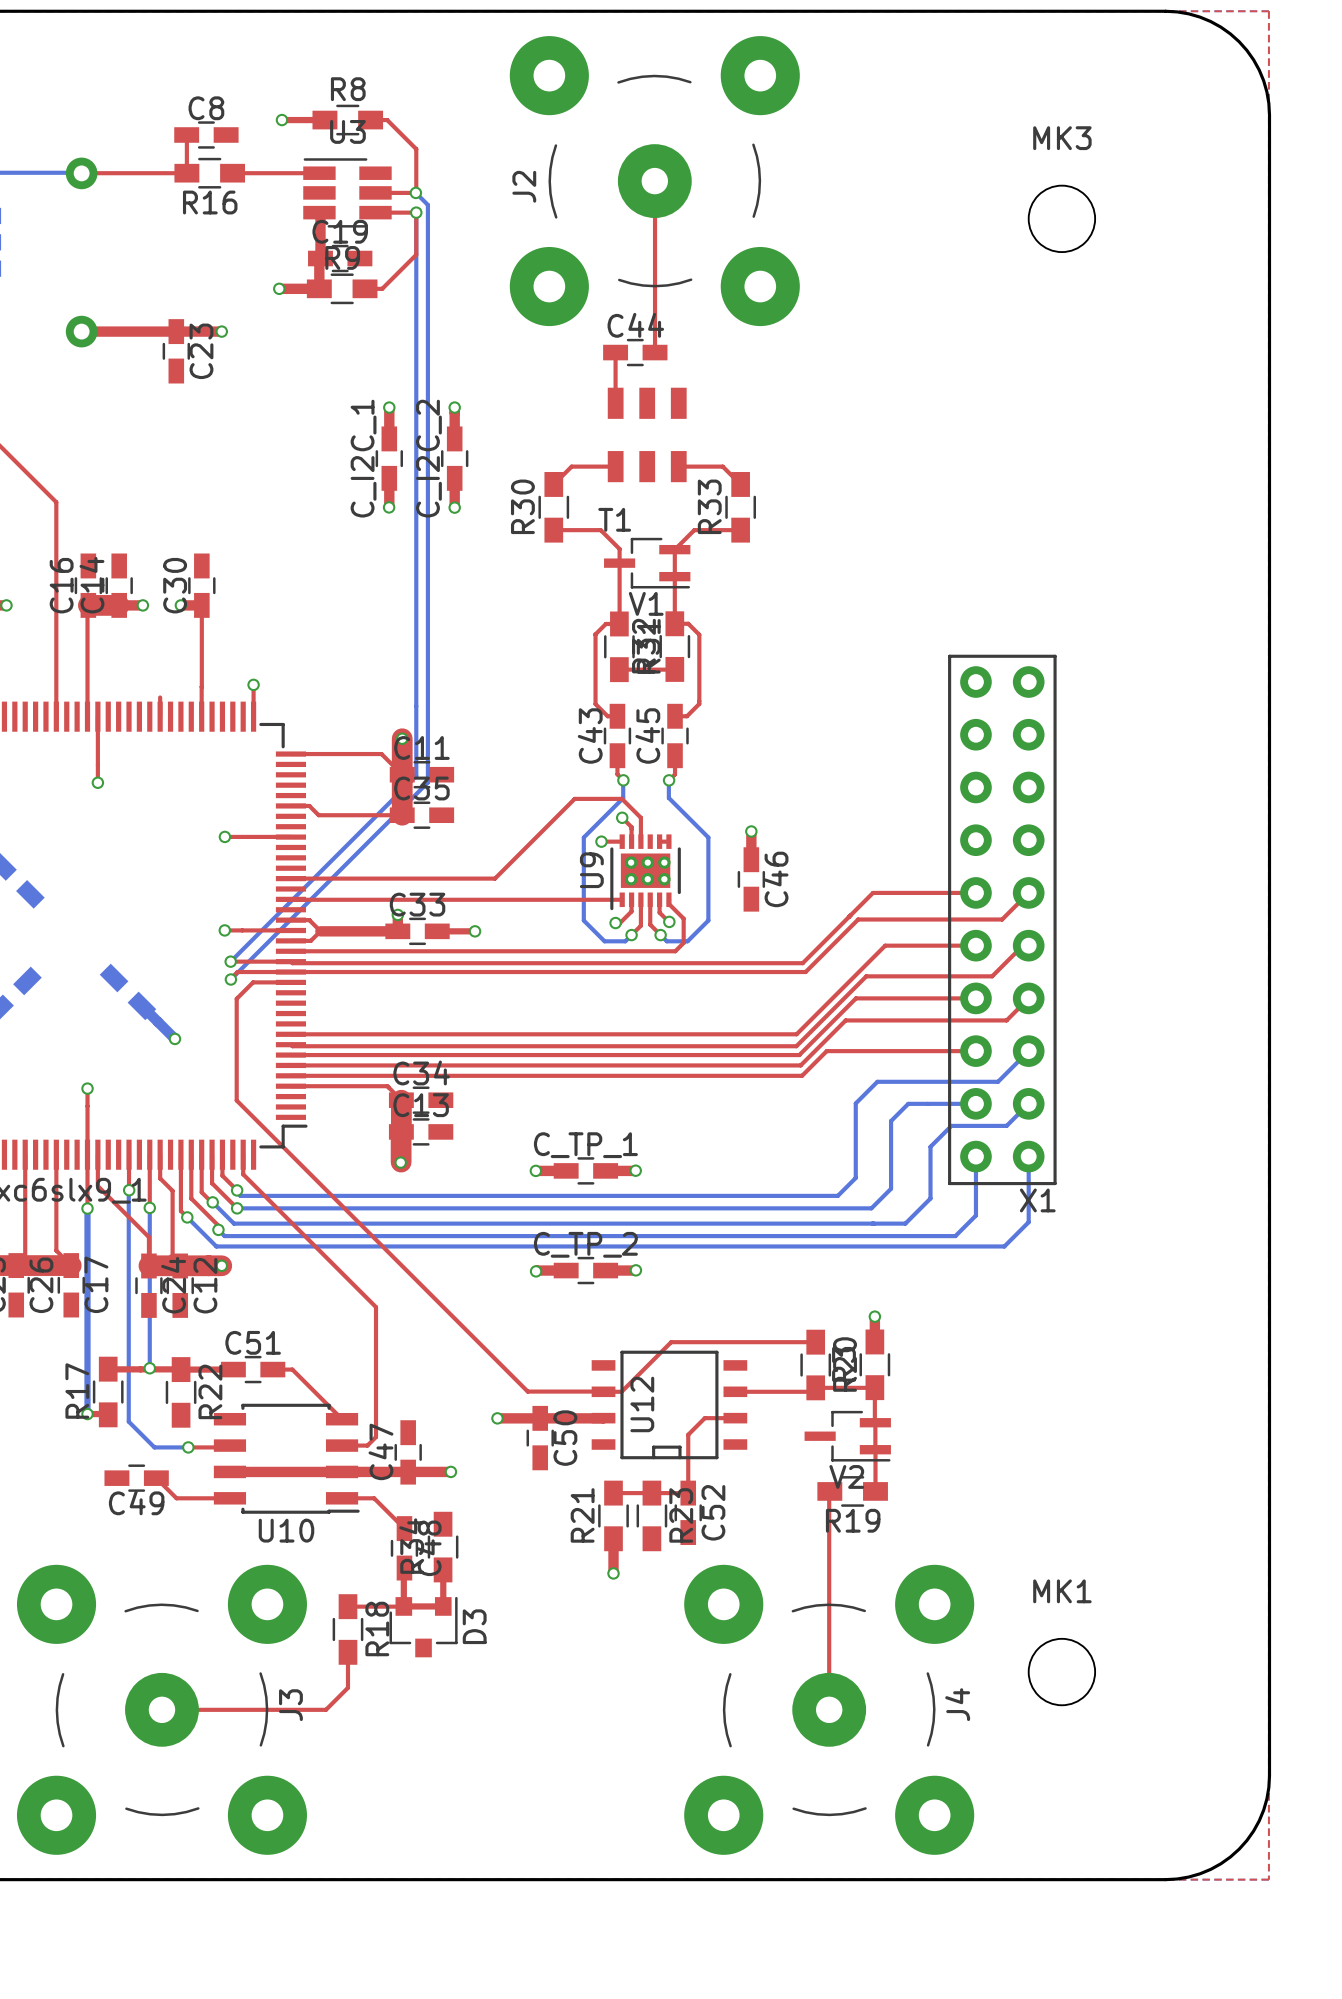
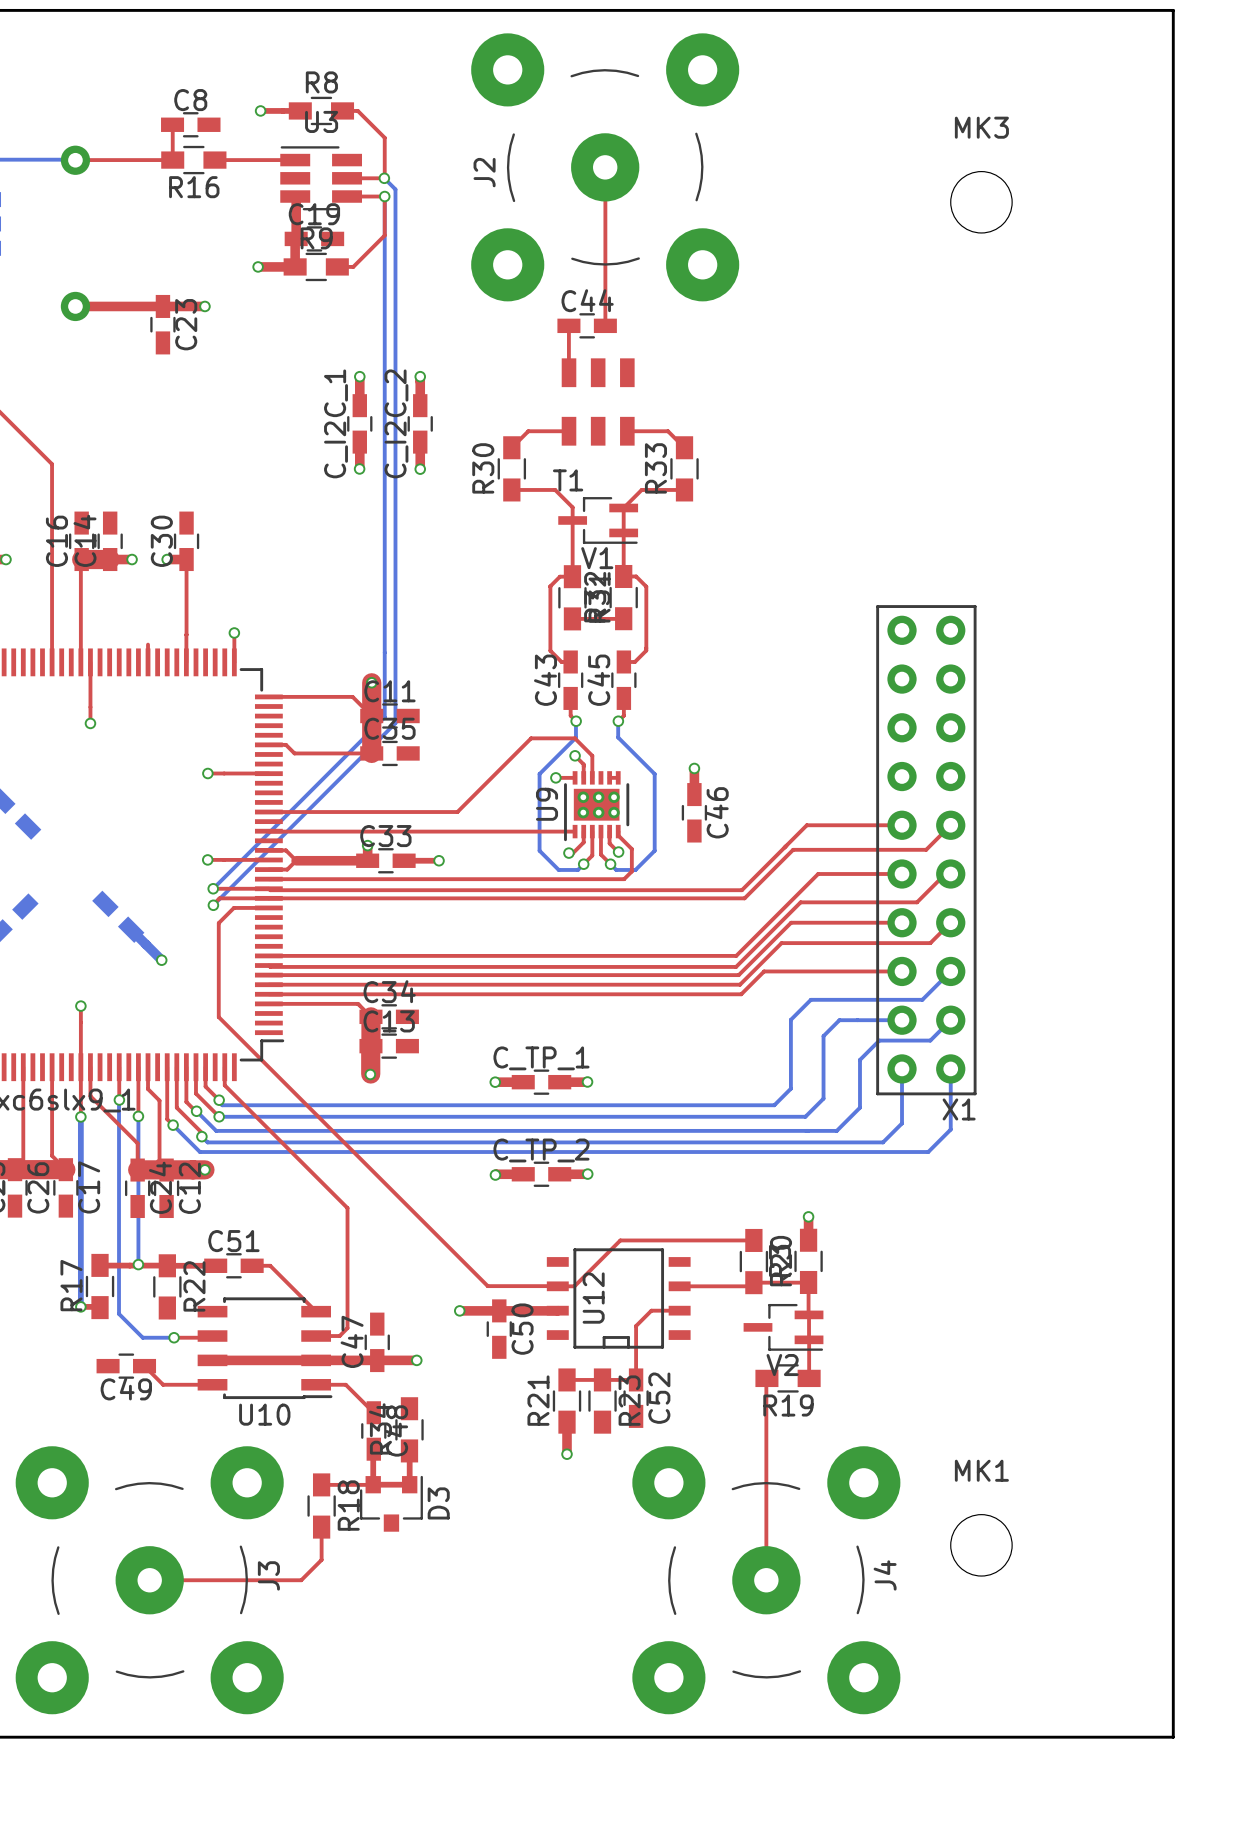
board edge: (1165, 11) (1199, 17) (1220, 27) (1239, 41) (1253, 59) (1263, 80) (1269, 115) -> (1077, 10) (1173, 10) (1173, 106)
board edge: (1269, 1775) (1263, 1810) (1253, 1831) (1239, 1849) (1220, 1863) (1199, 1873) (1165, 1879) -> (1173, 1641) (1173, 1737) (1077, 1737)

